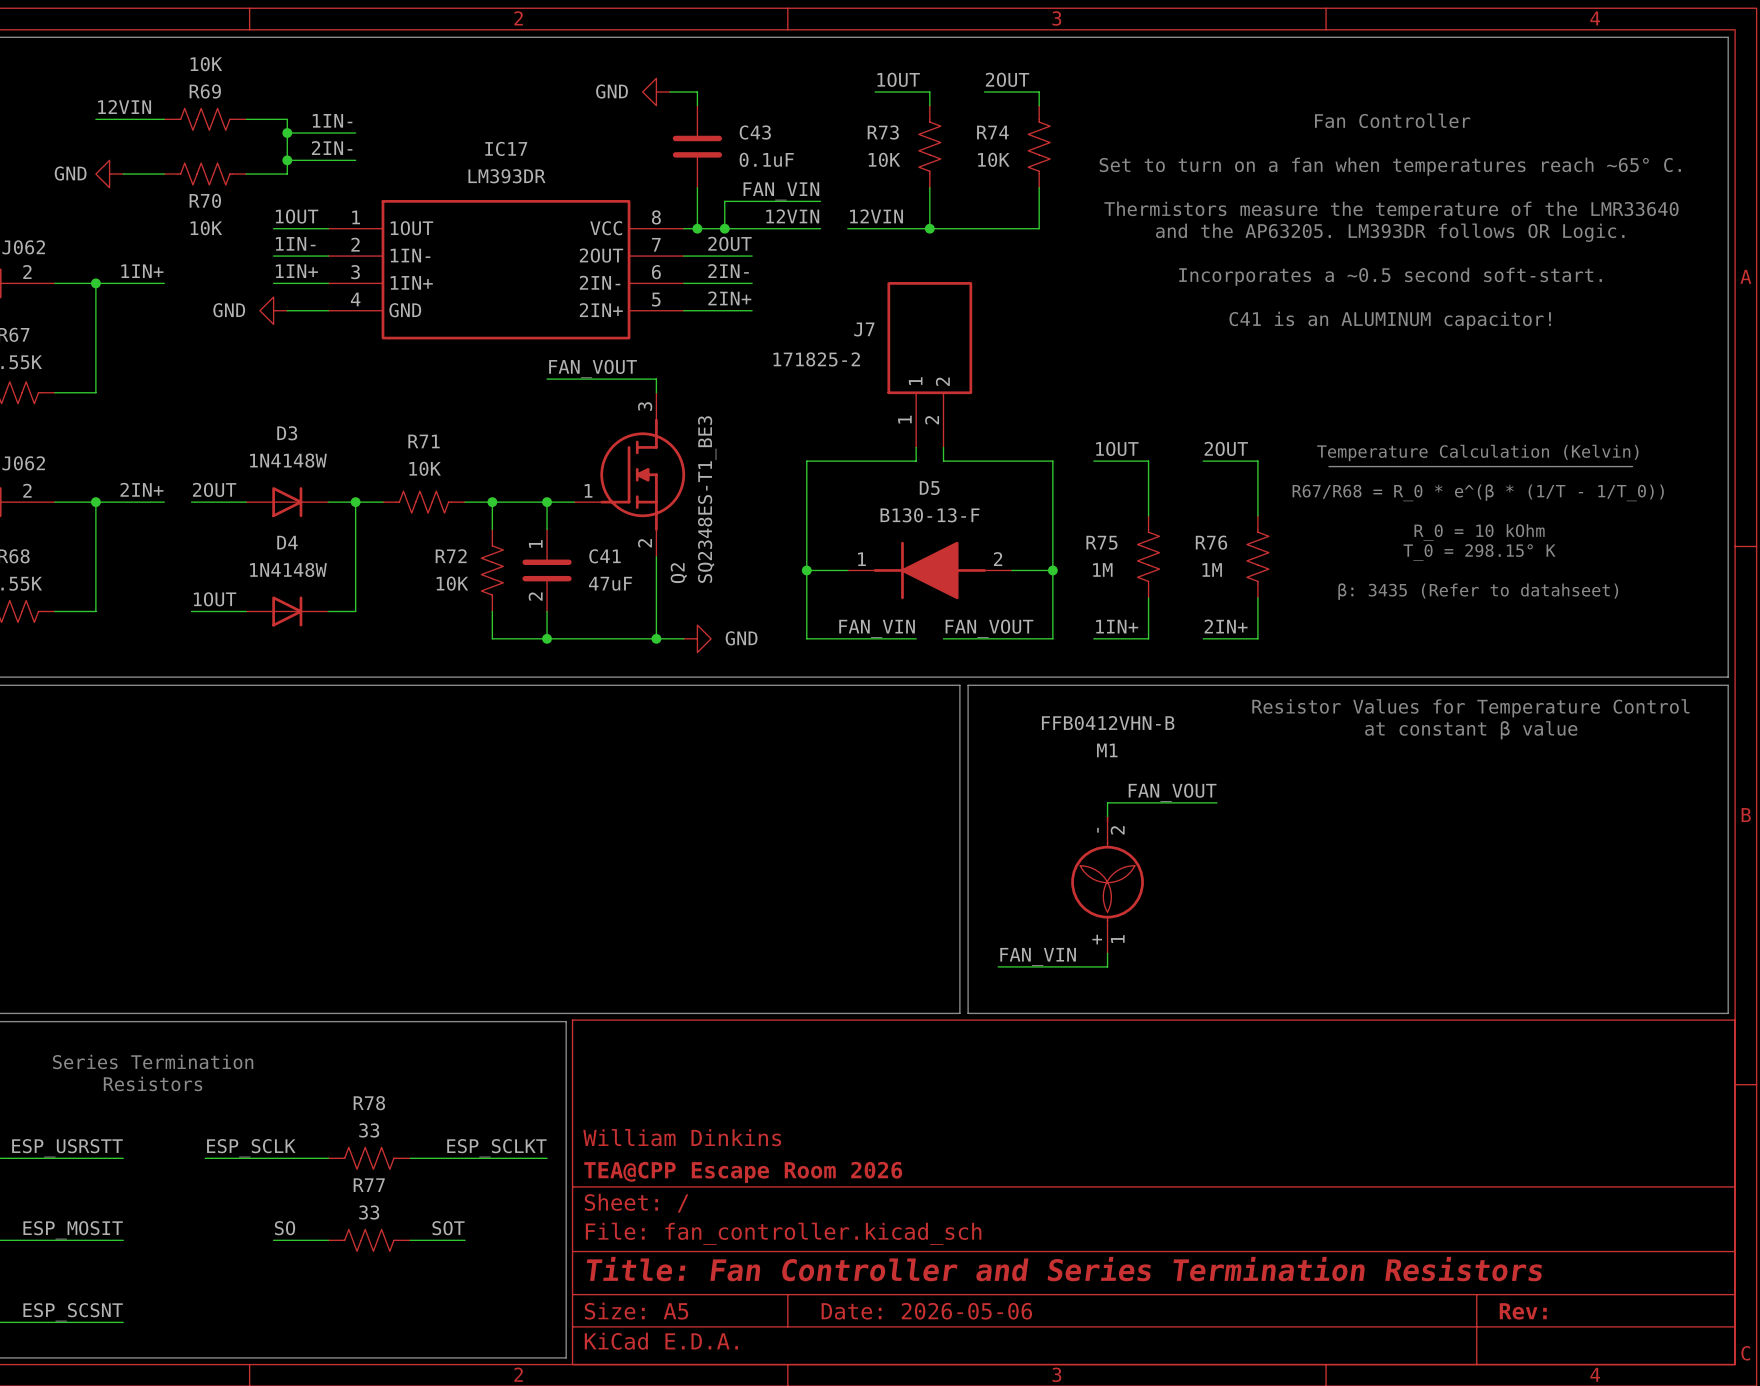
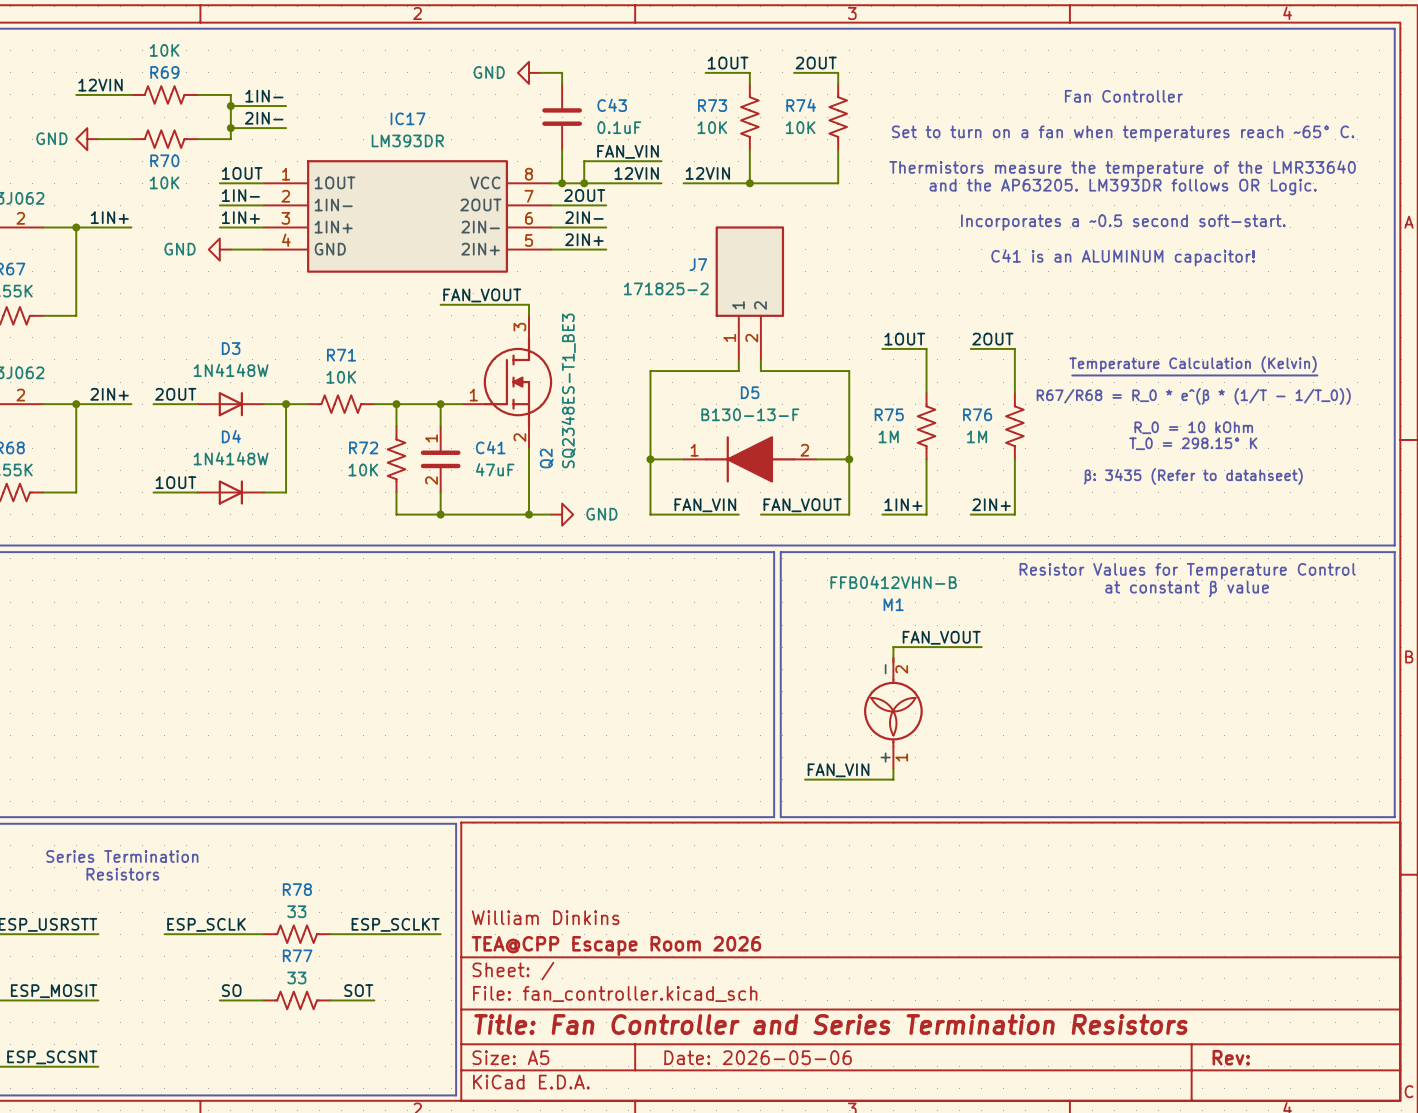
label position: 1OUT (1117, 448) -> 1OUT (904, 339)
label position: 2OUT (1226, 448) -> 2OUT (992, 339)
wire: (1093, 461) (1148, 461) -> (882, 348) (926, 348) (926, 371)
wire: (1203, 461) (1257, 461) -> (970, 348) (1014, 348) (1014, 371)
R75 position: (1148, 556) -> (926, 426)
R76 position: (1257, 556) -> (1014, 426)

